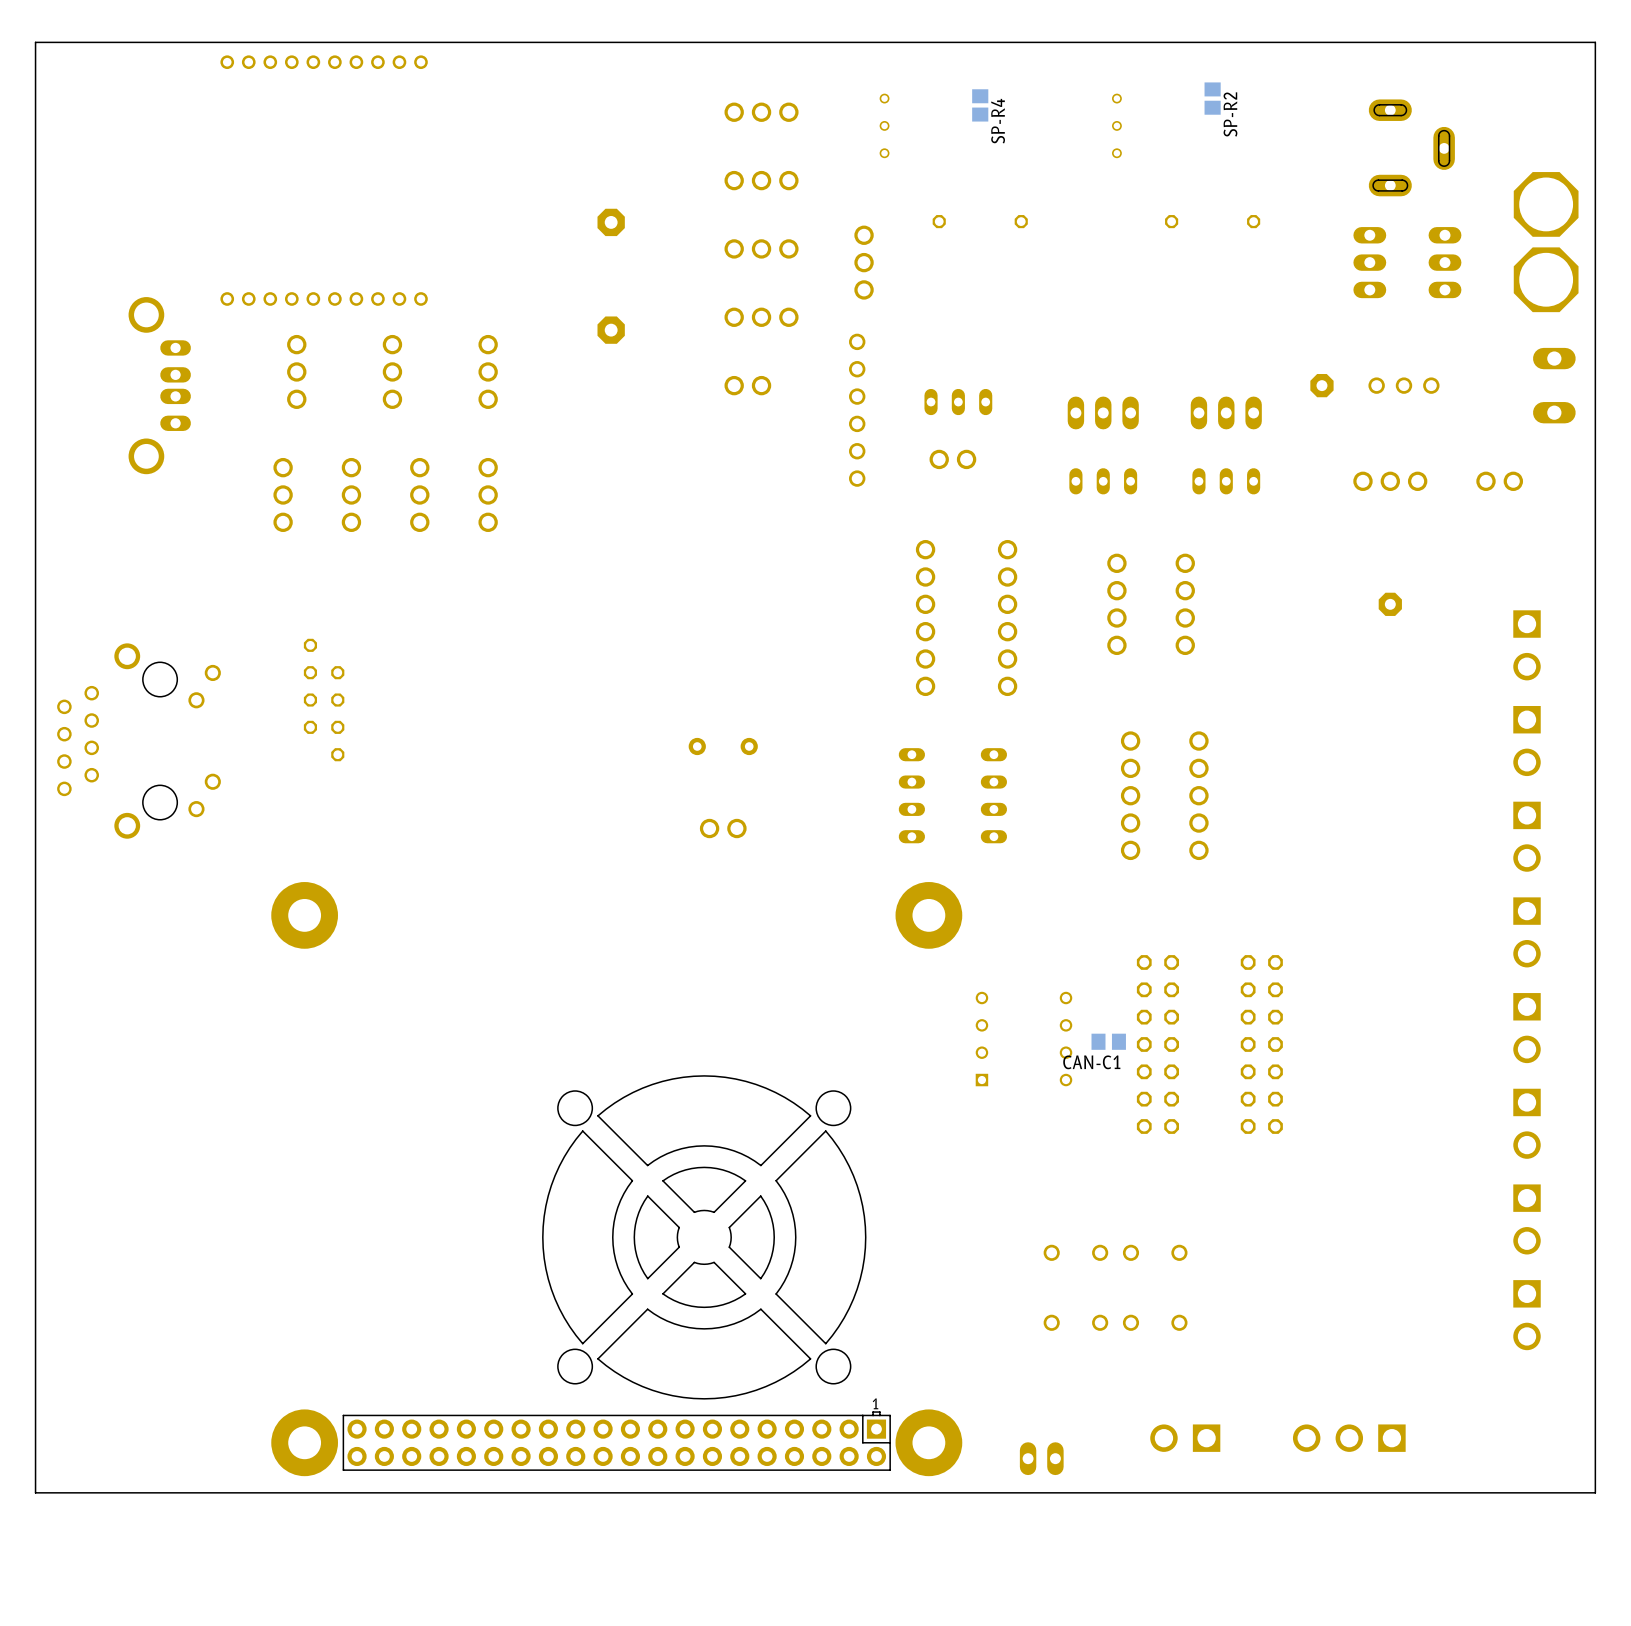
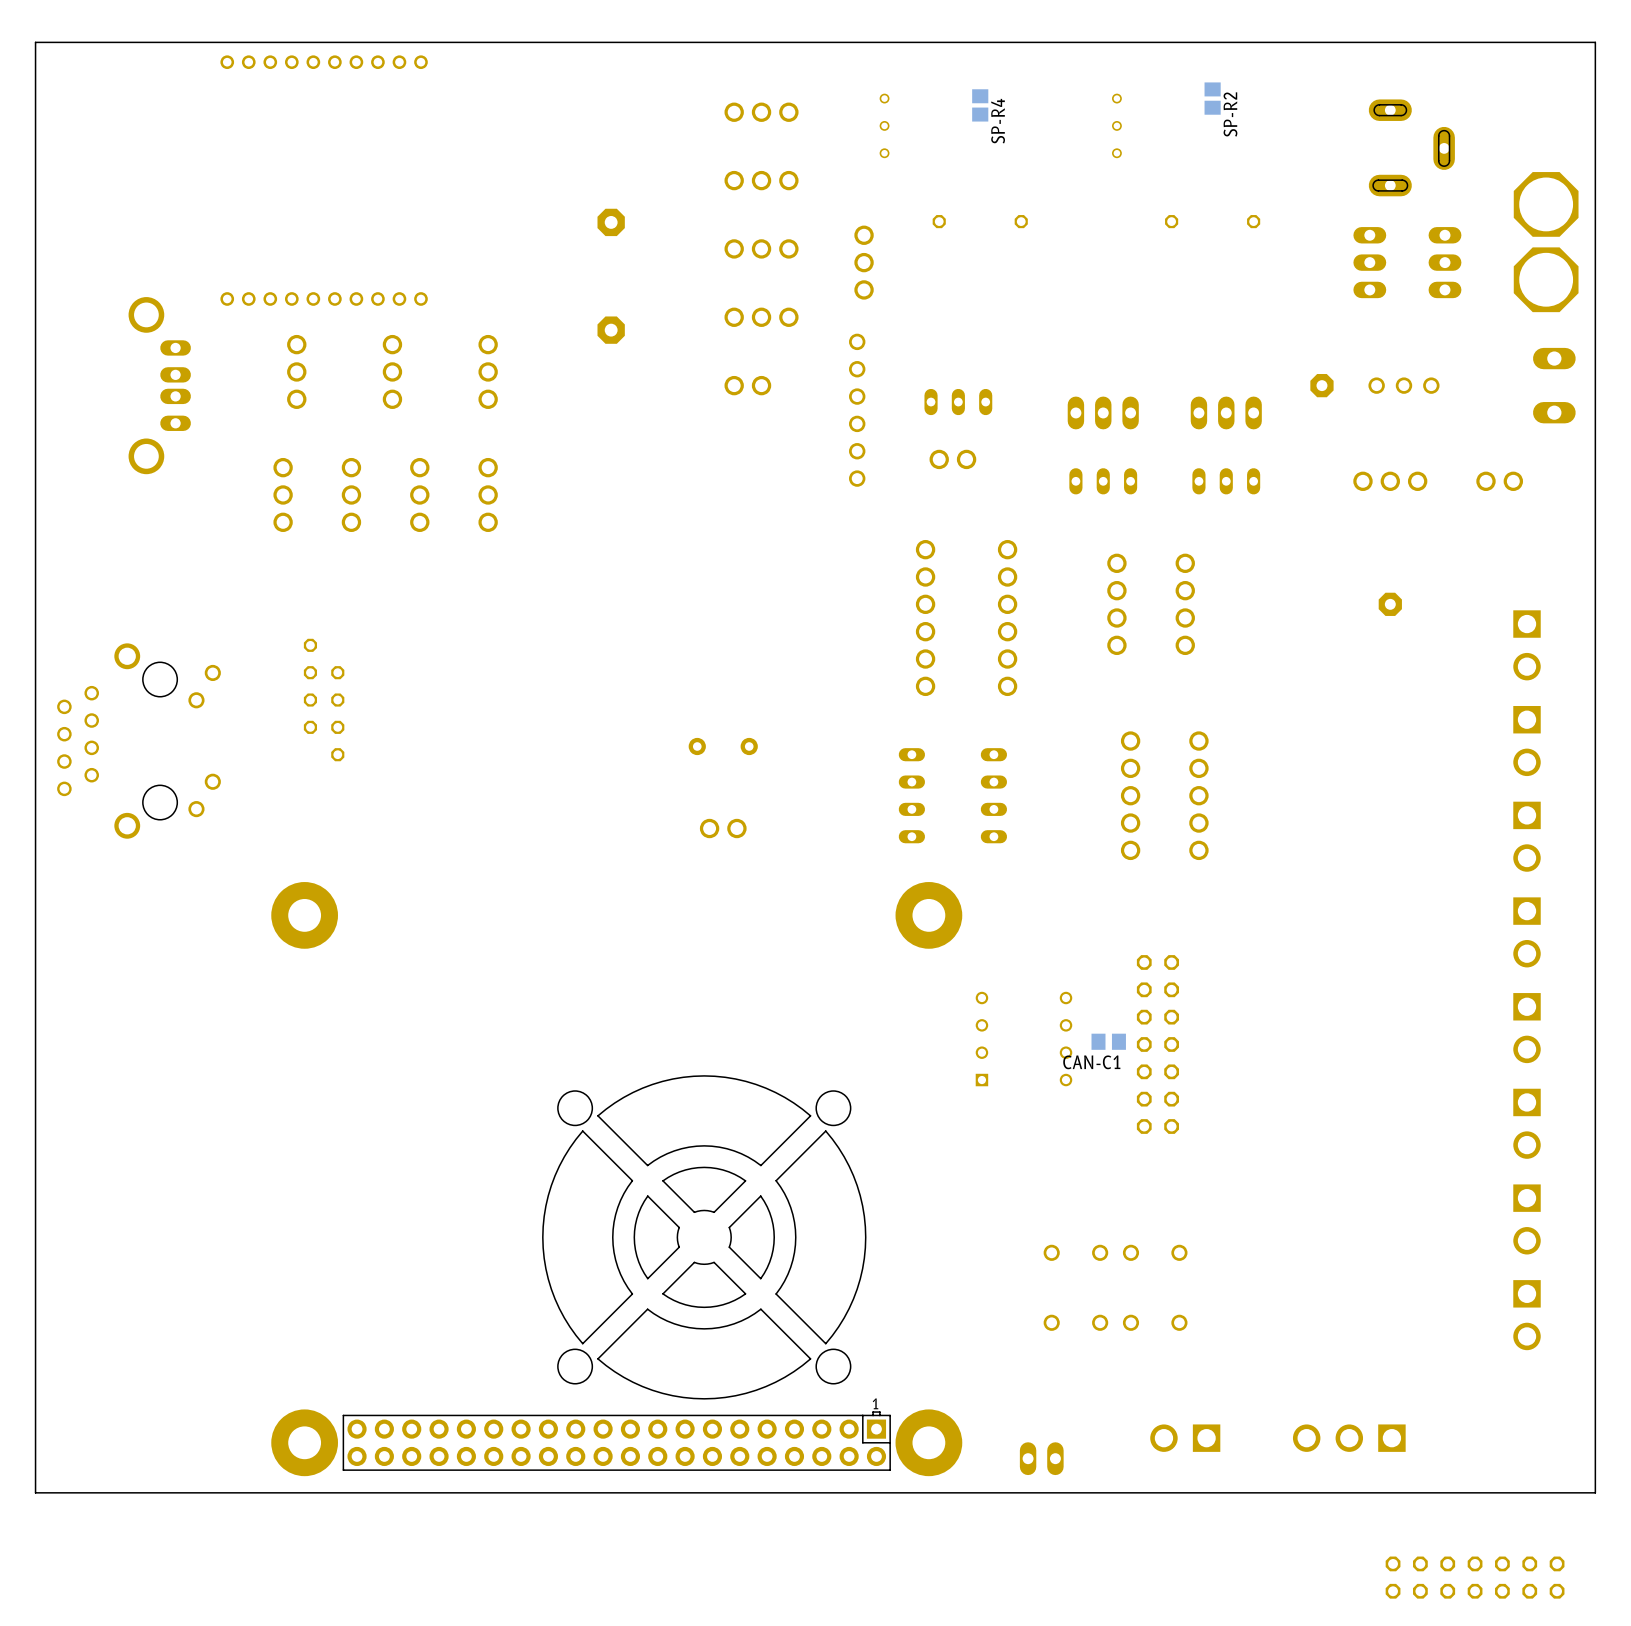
part: (1261, 1044) -> none
part: none -> (1475, 1577)

